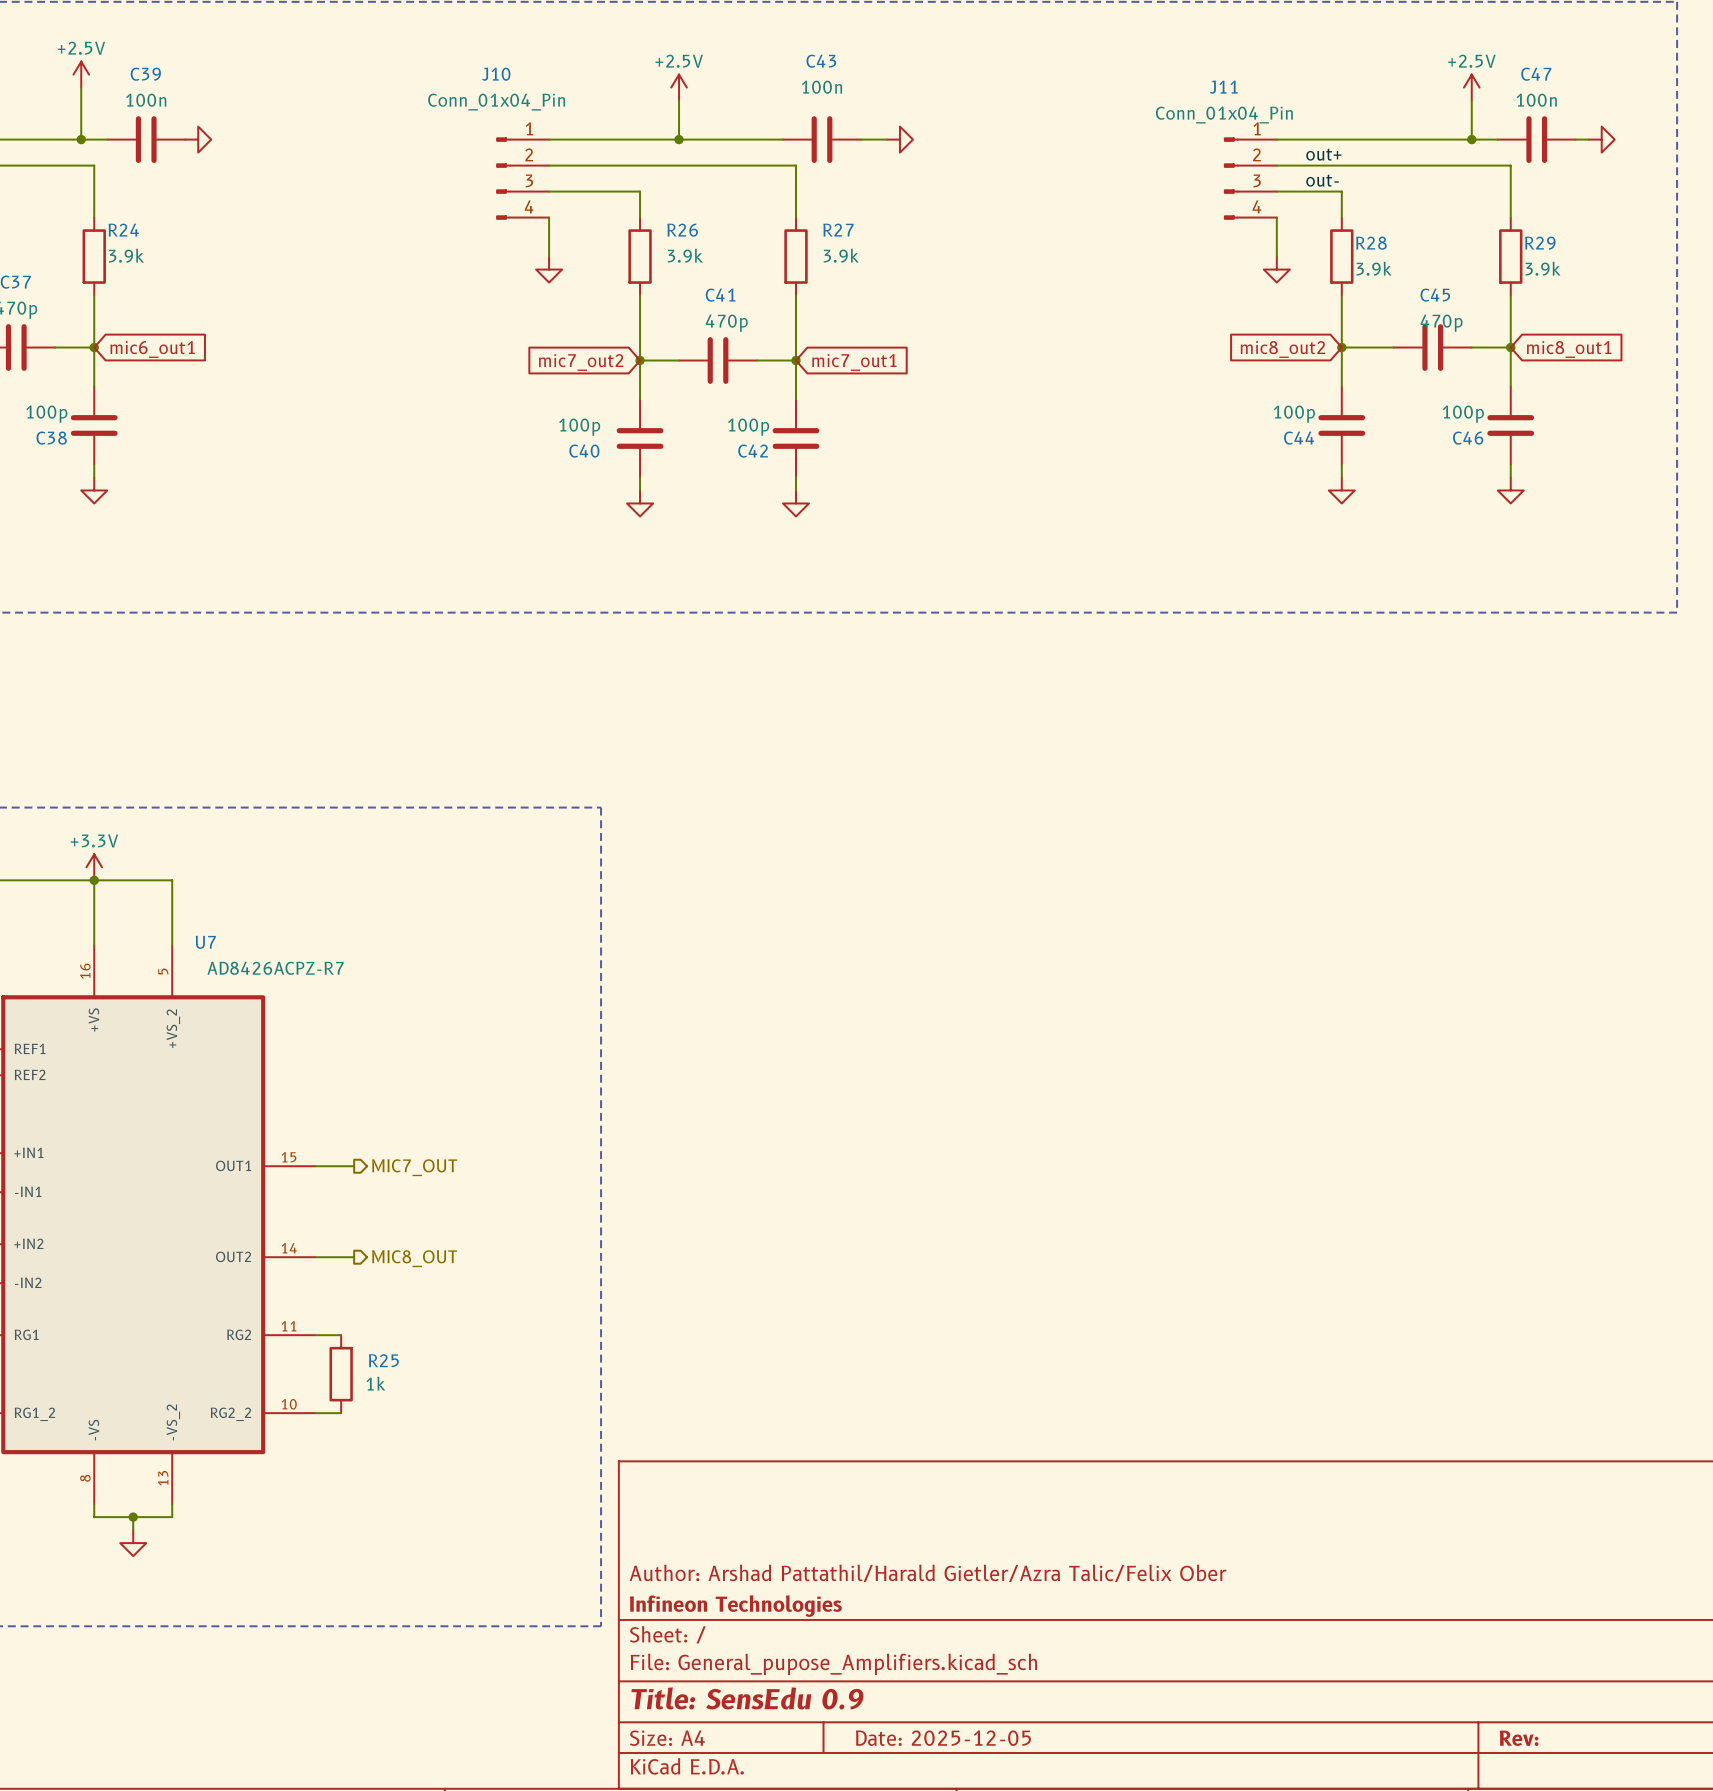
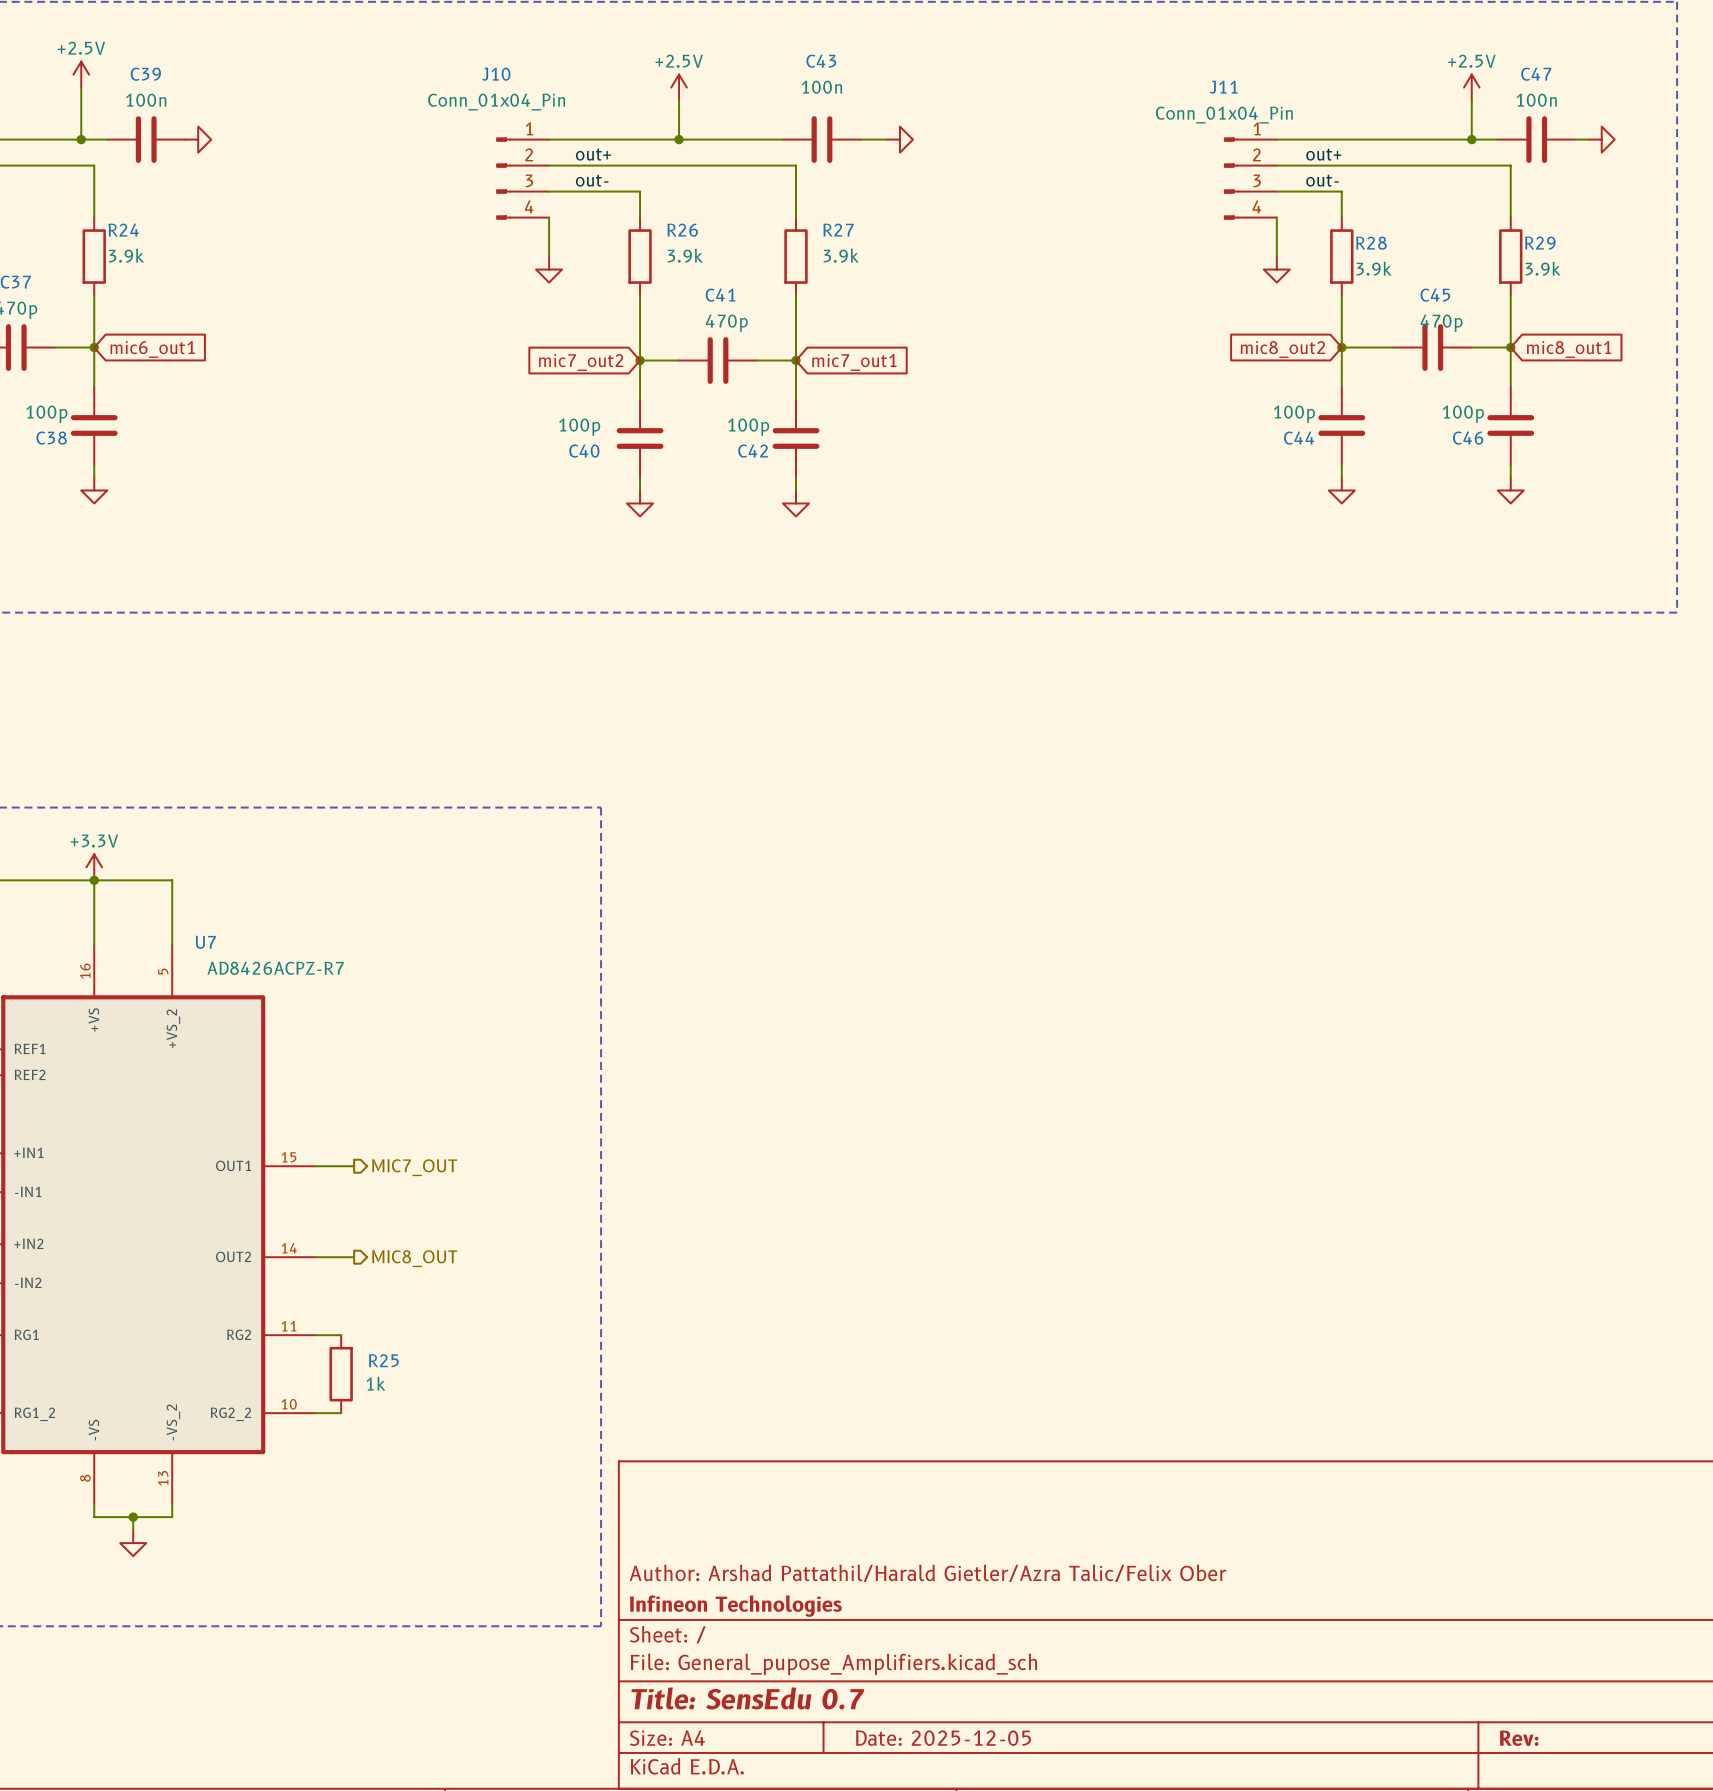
label: none -> out+ (593, 154)
label: none -> out- (592, 180)
title block: Title: SensEdu 0.9 (747, 1698) -> Title: SensEdu 0.7 (747, 1698)

